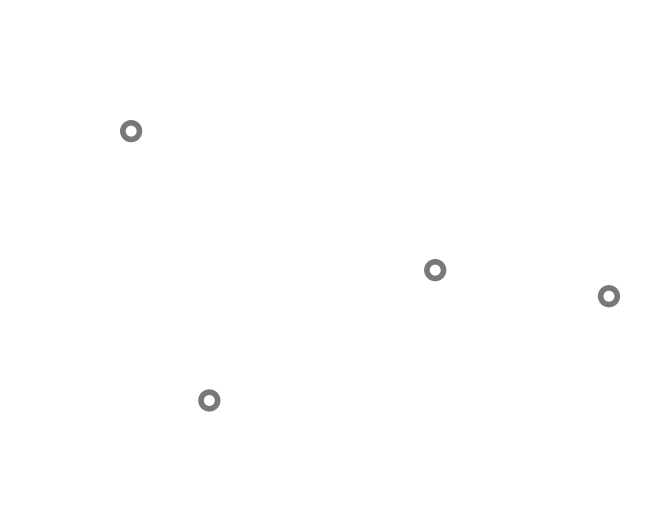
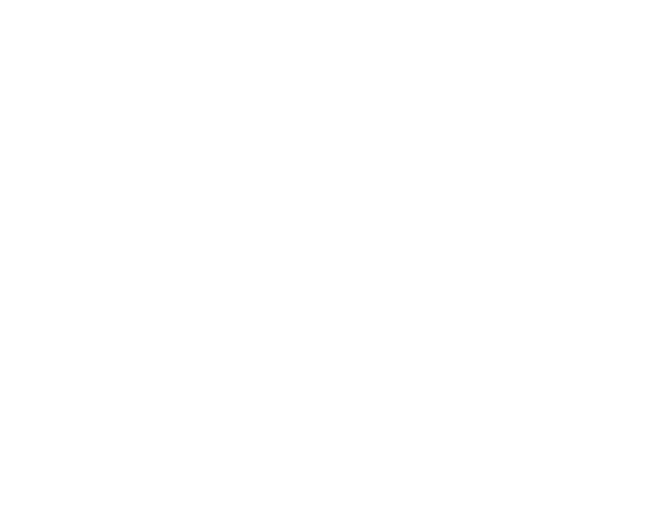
via: (131, 131) -> none
via: (435, 270) -> none
via: (608, 296) -> none
via: (209, 400) -> none

